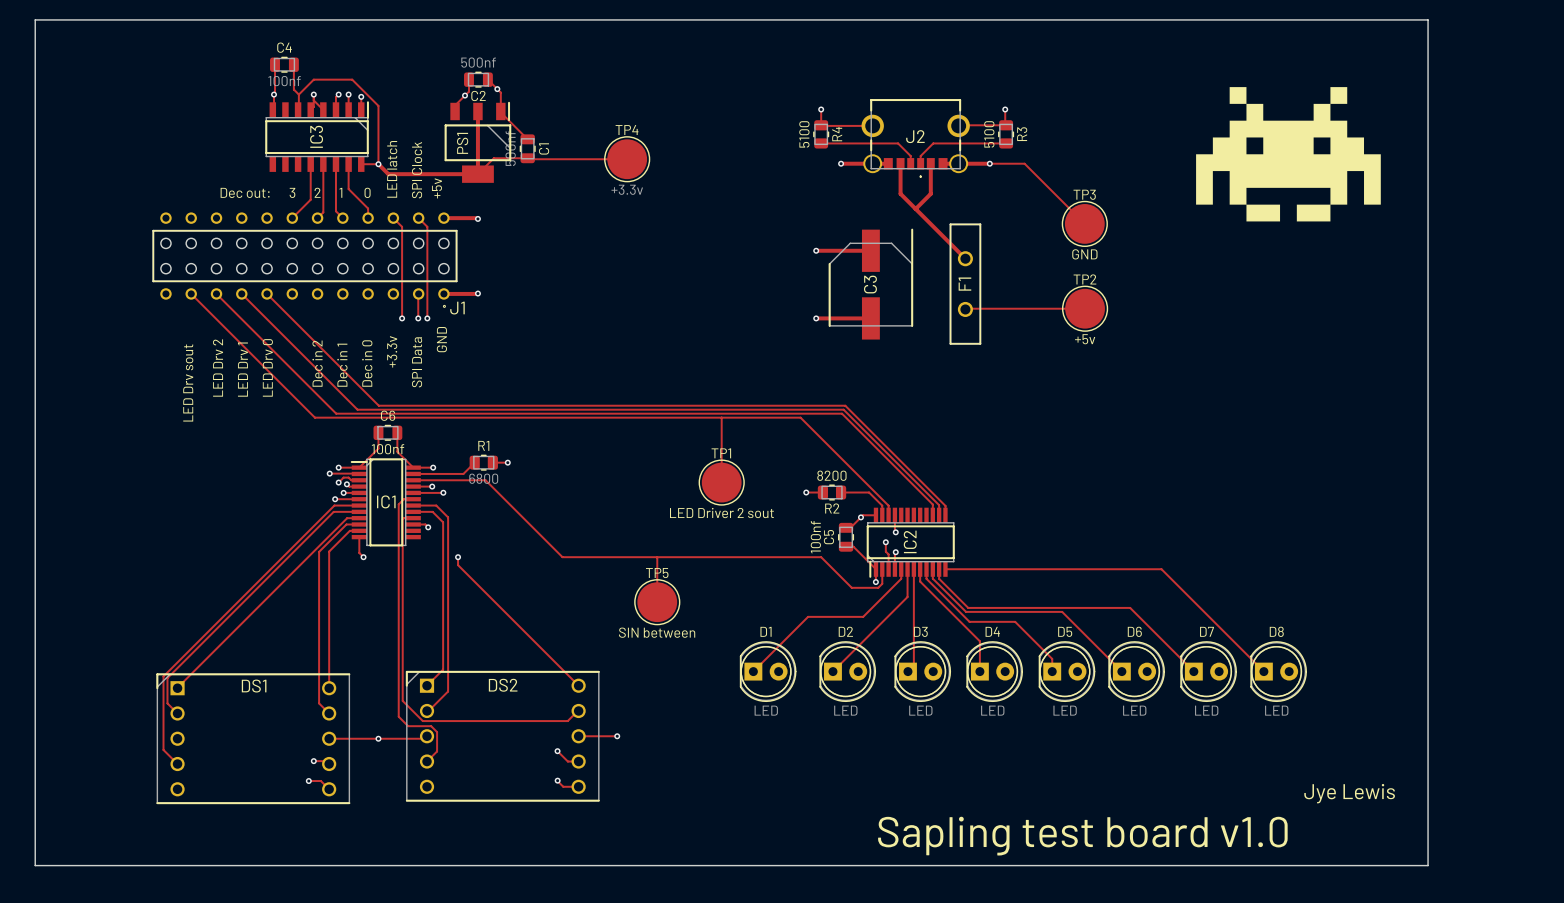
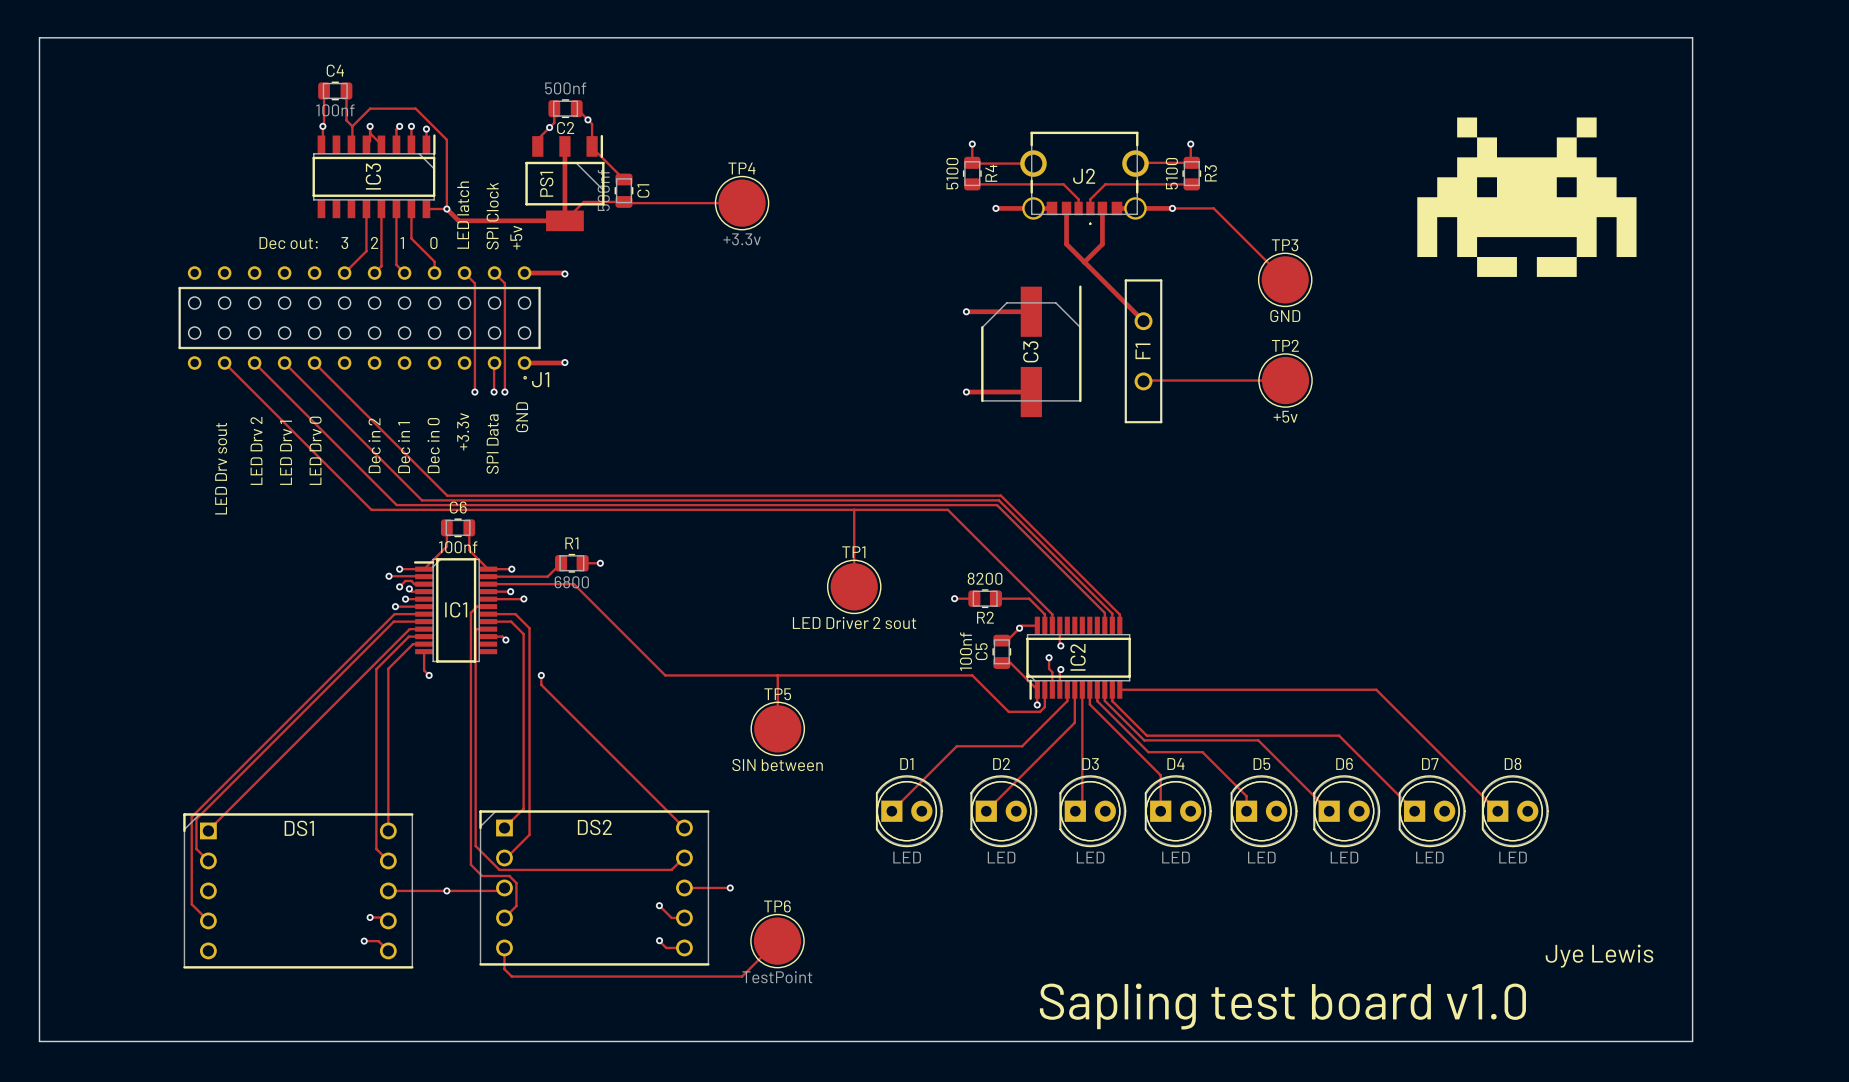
track: none -> (777, 941) (742, 976) (511, 976) (504, 969) (504, 947)
TP6: none -> TestPoint (777, 941)

